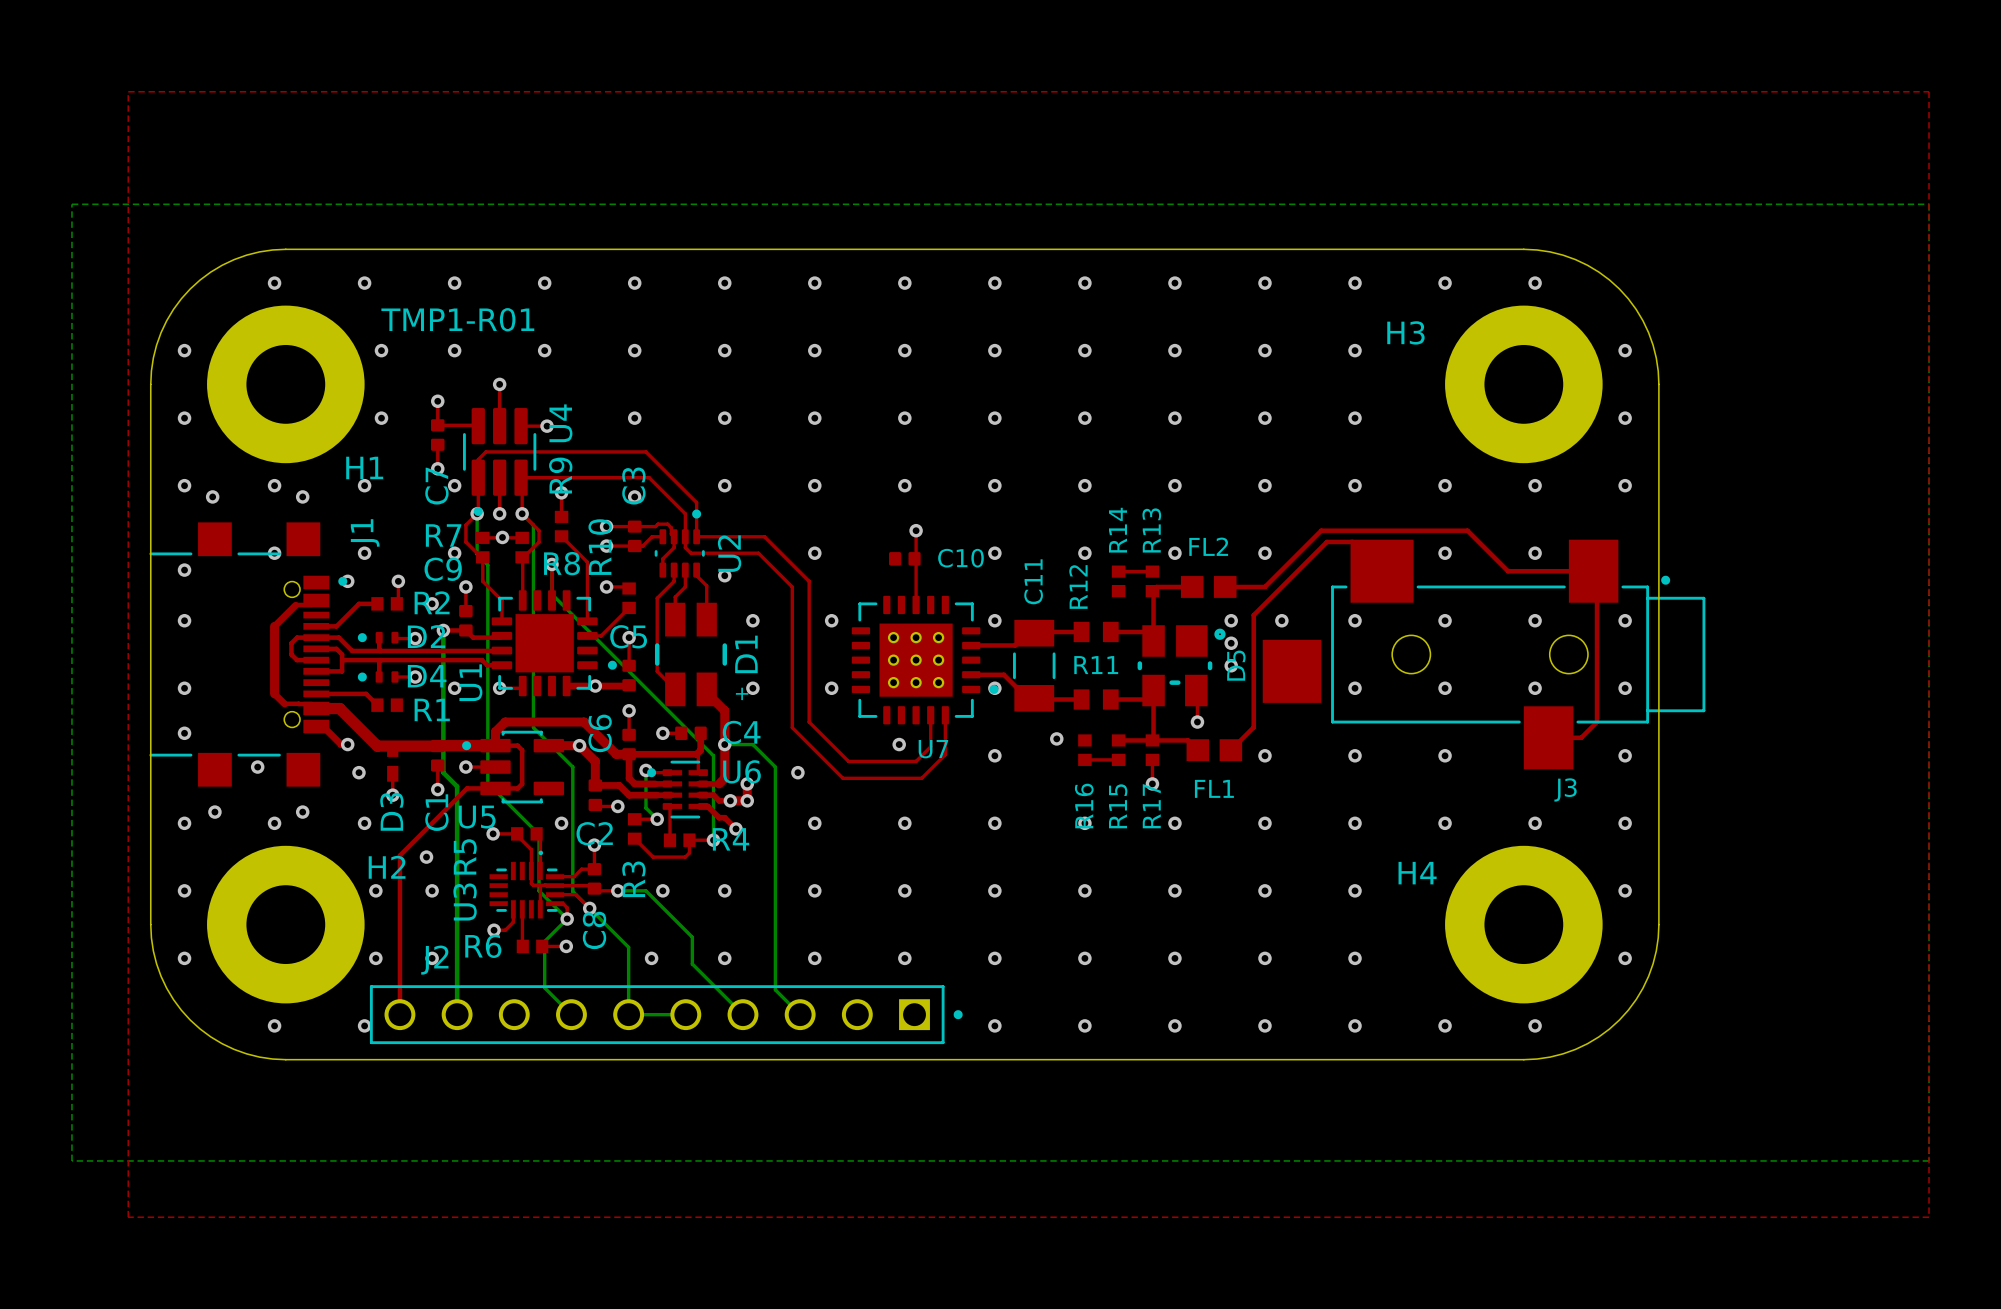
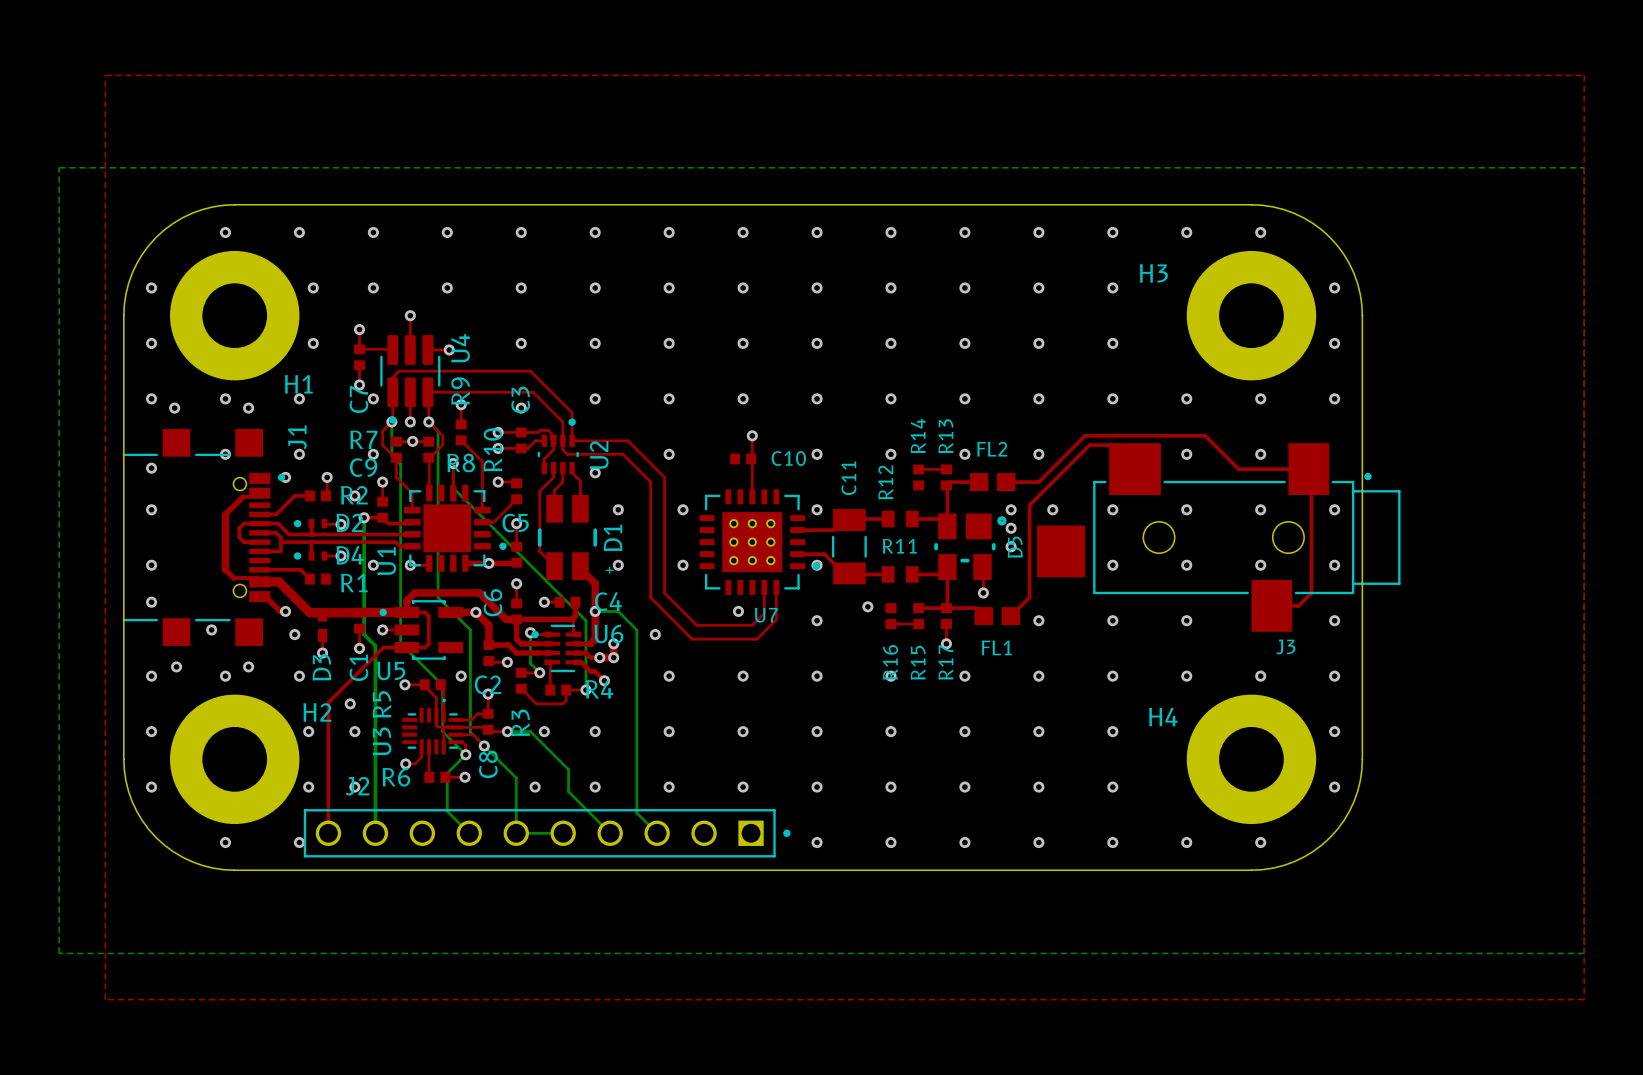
text: TMP1-R01 (457, 319) -> none

